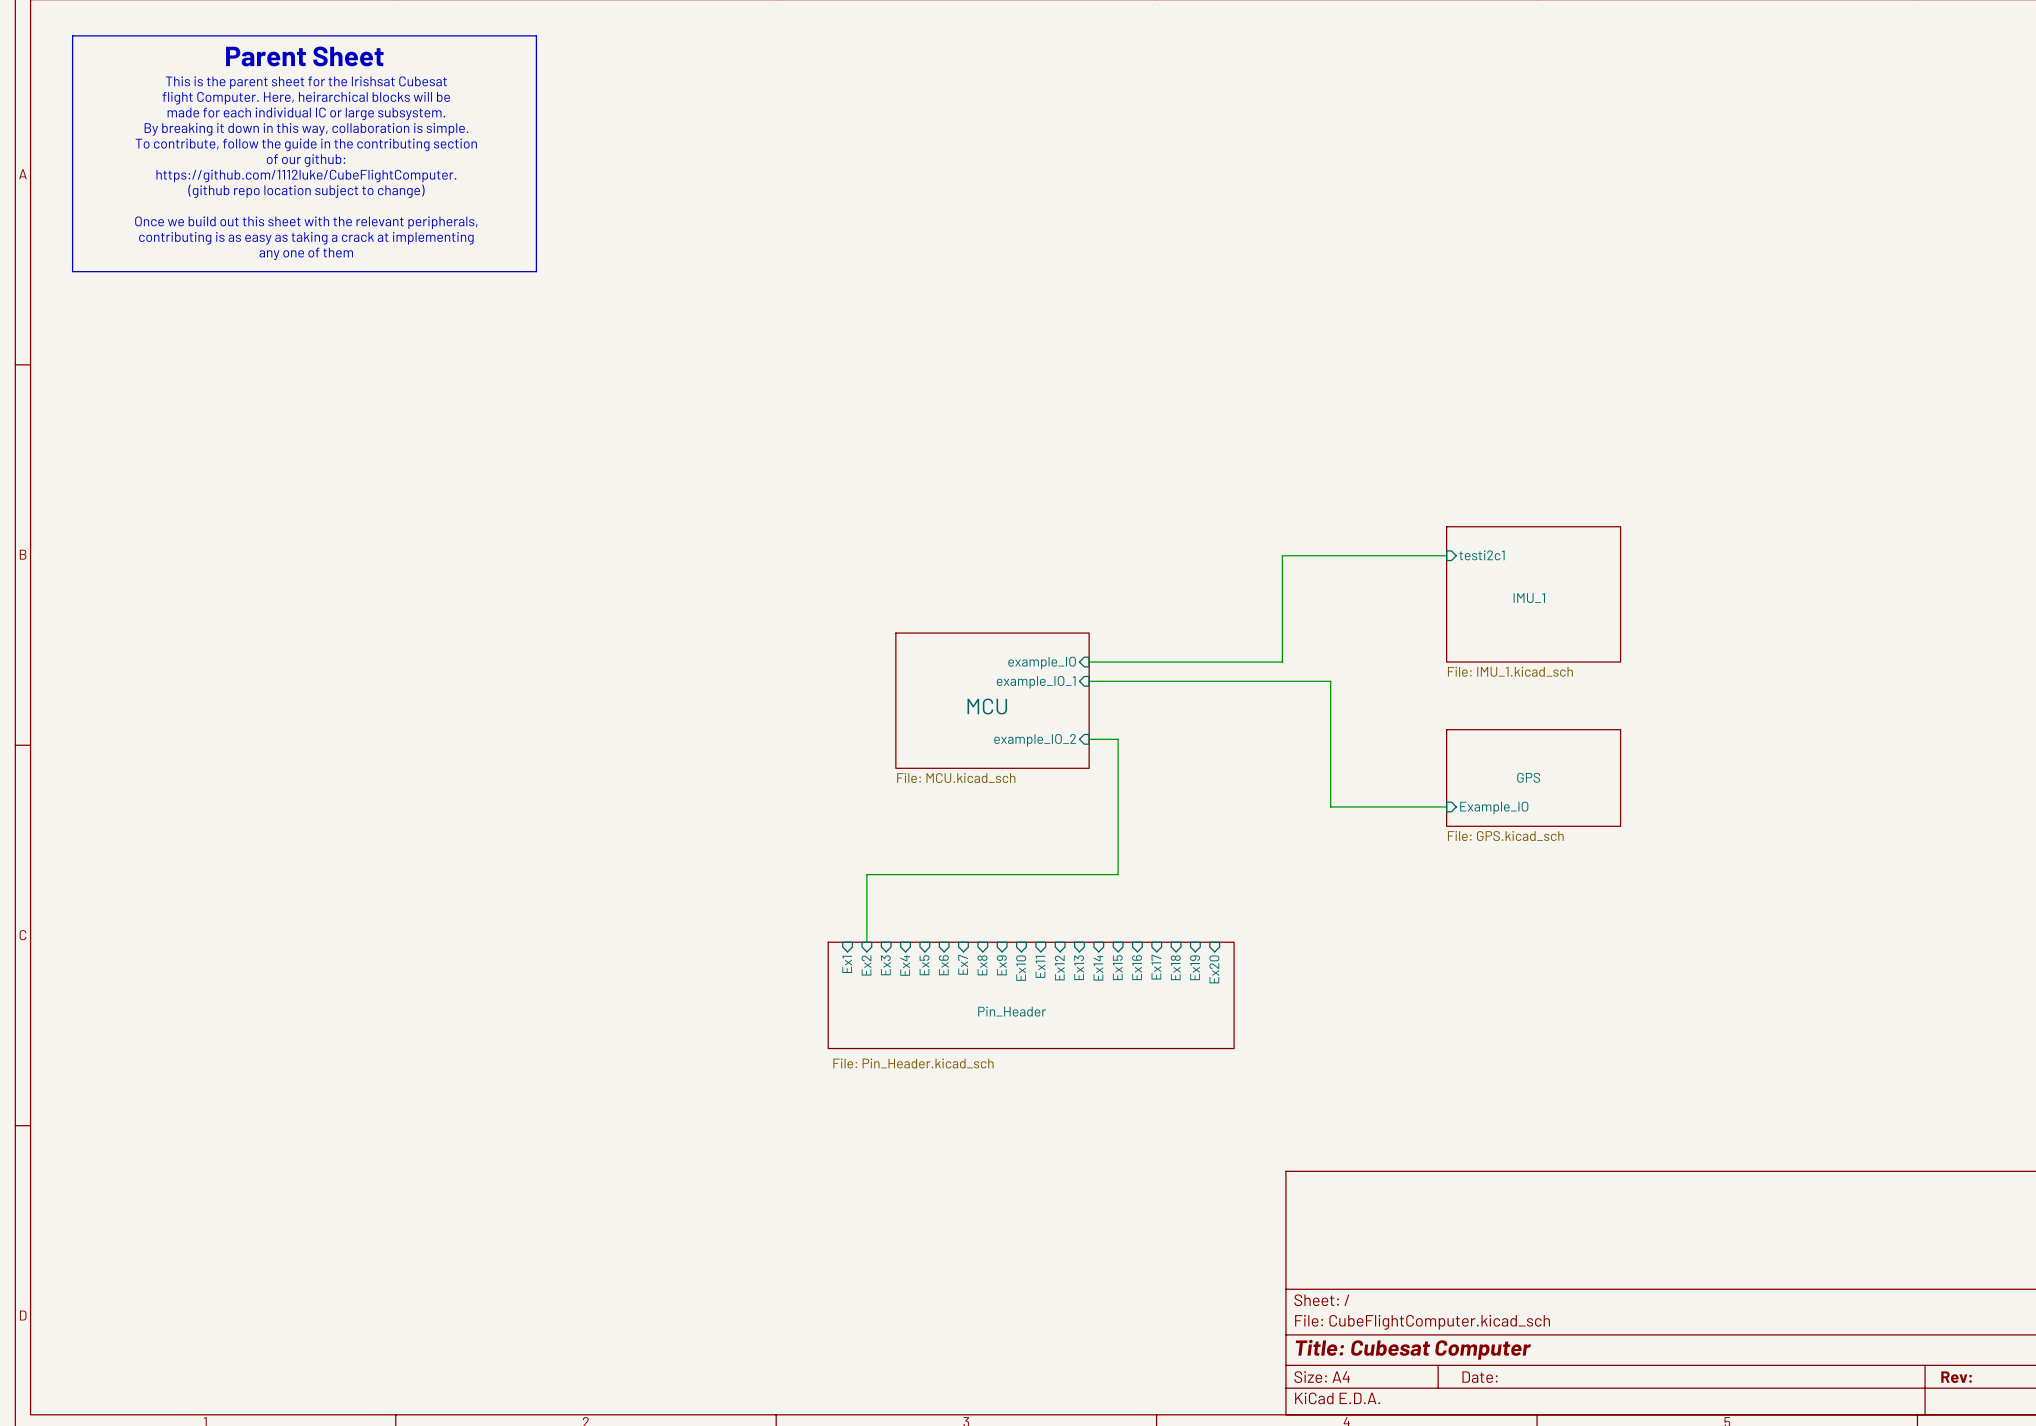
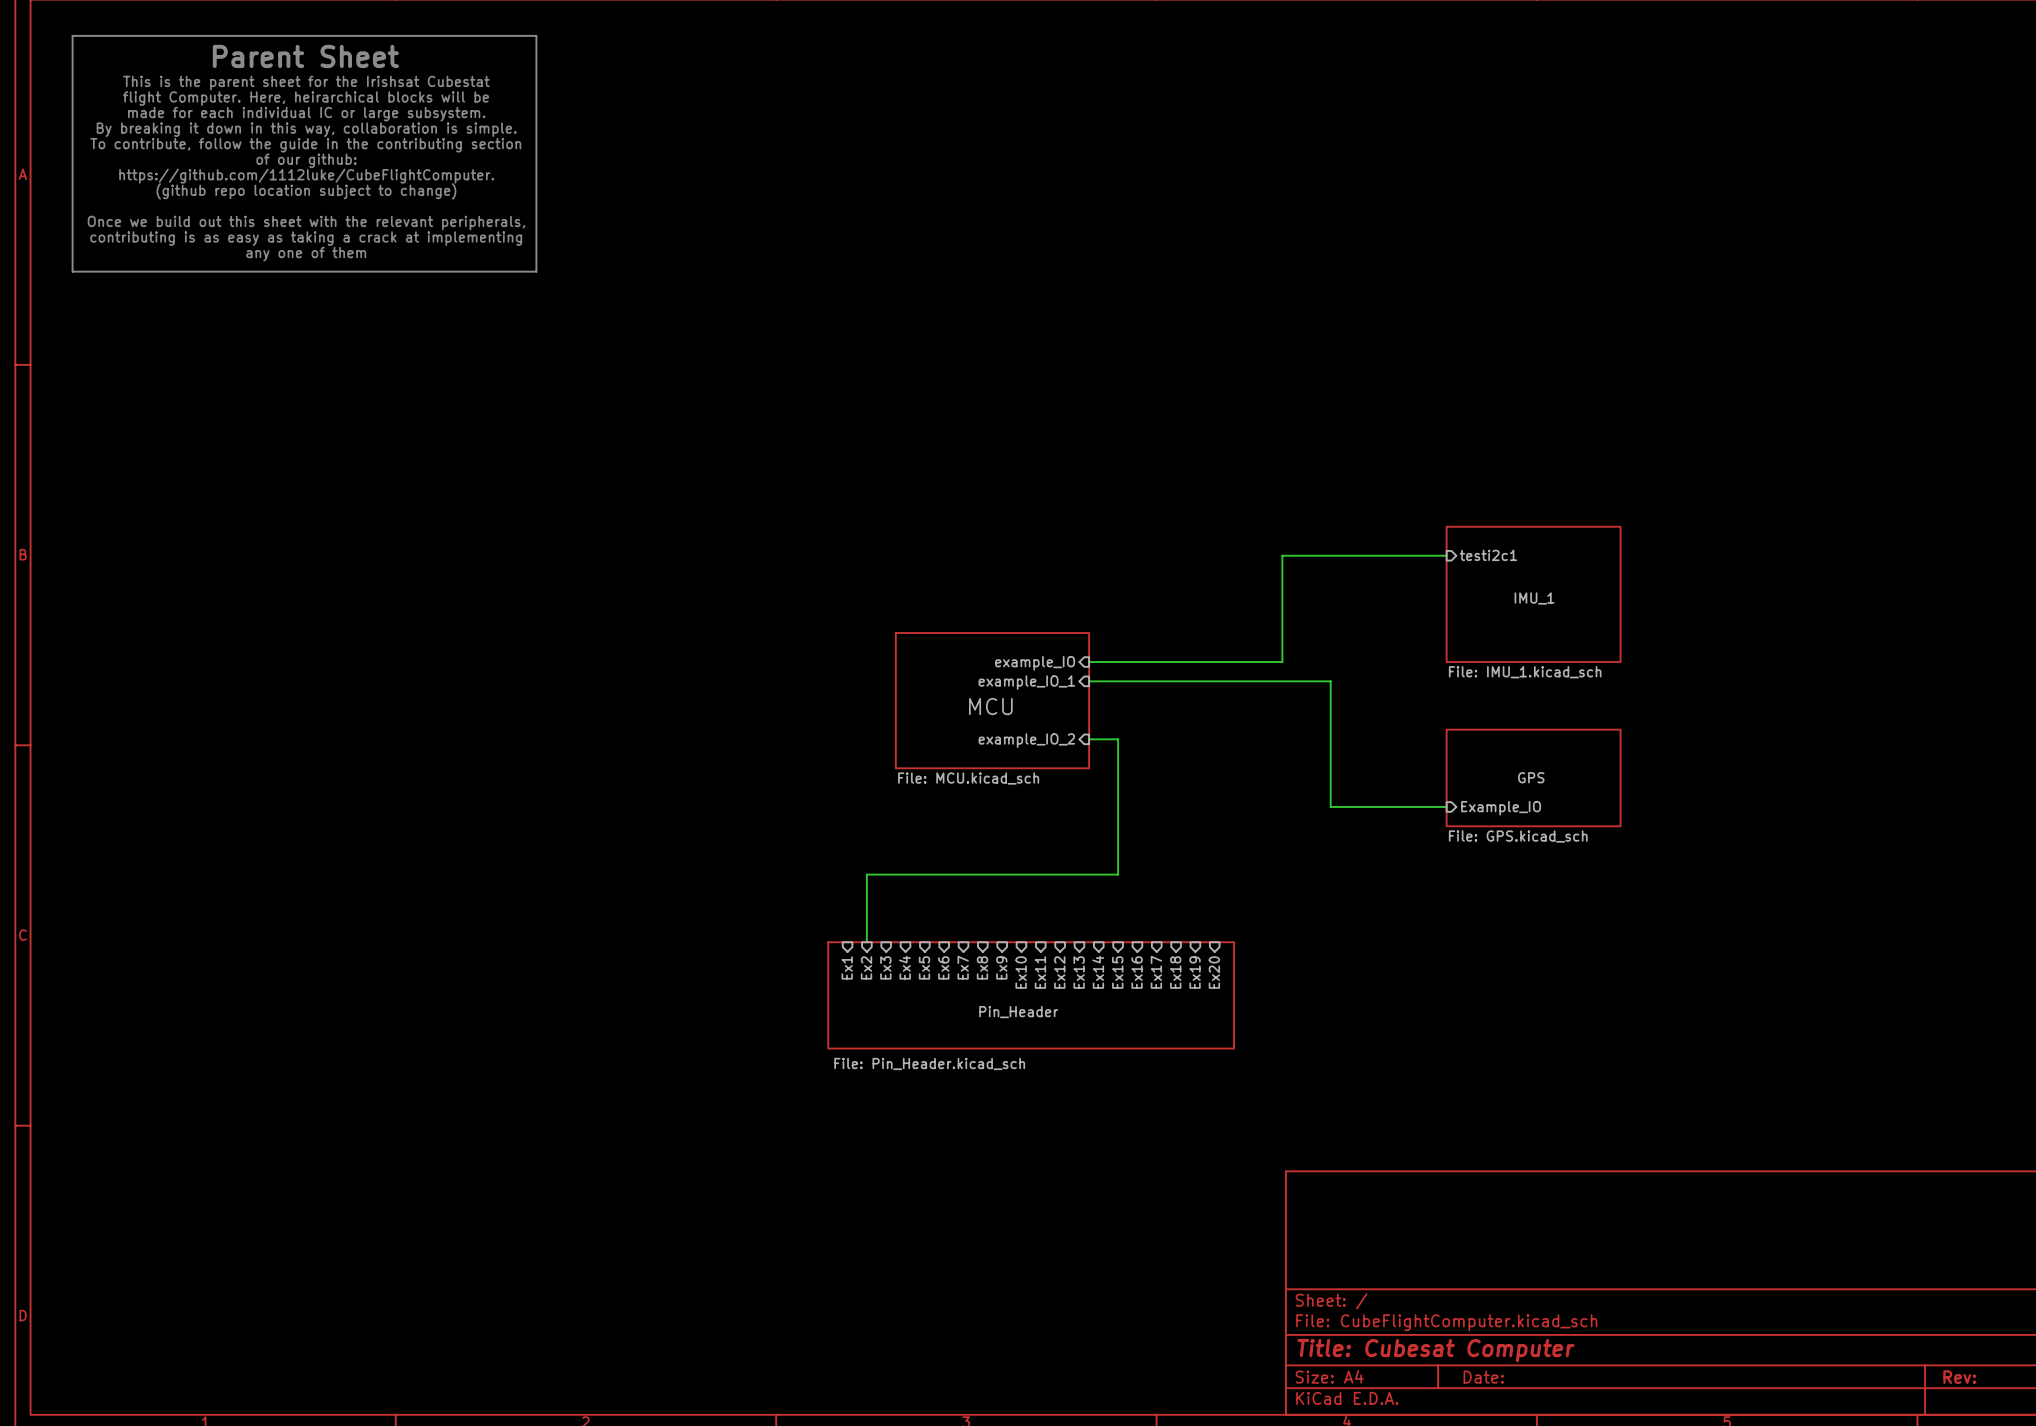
text: This is the parent sheet for the Irishsat Cubesat (306, 82) -> This is the parent sheet for the Irishsat Cubestat (306, 83)

